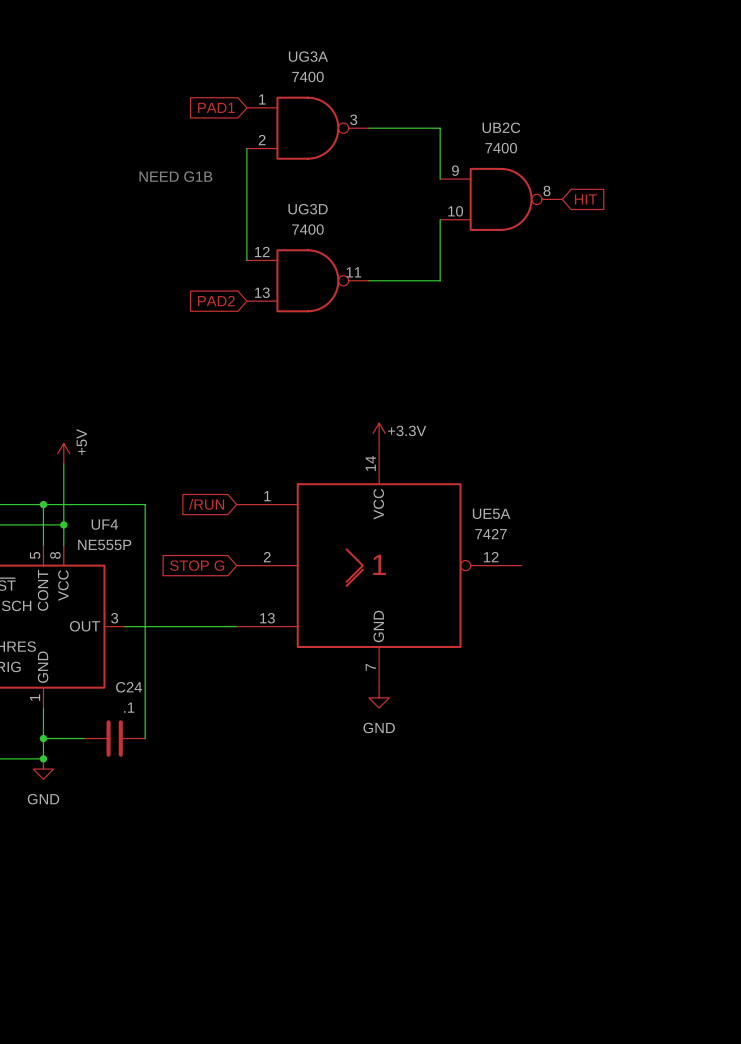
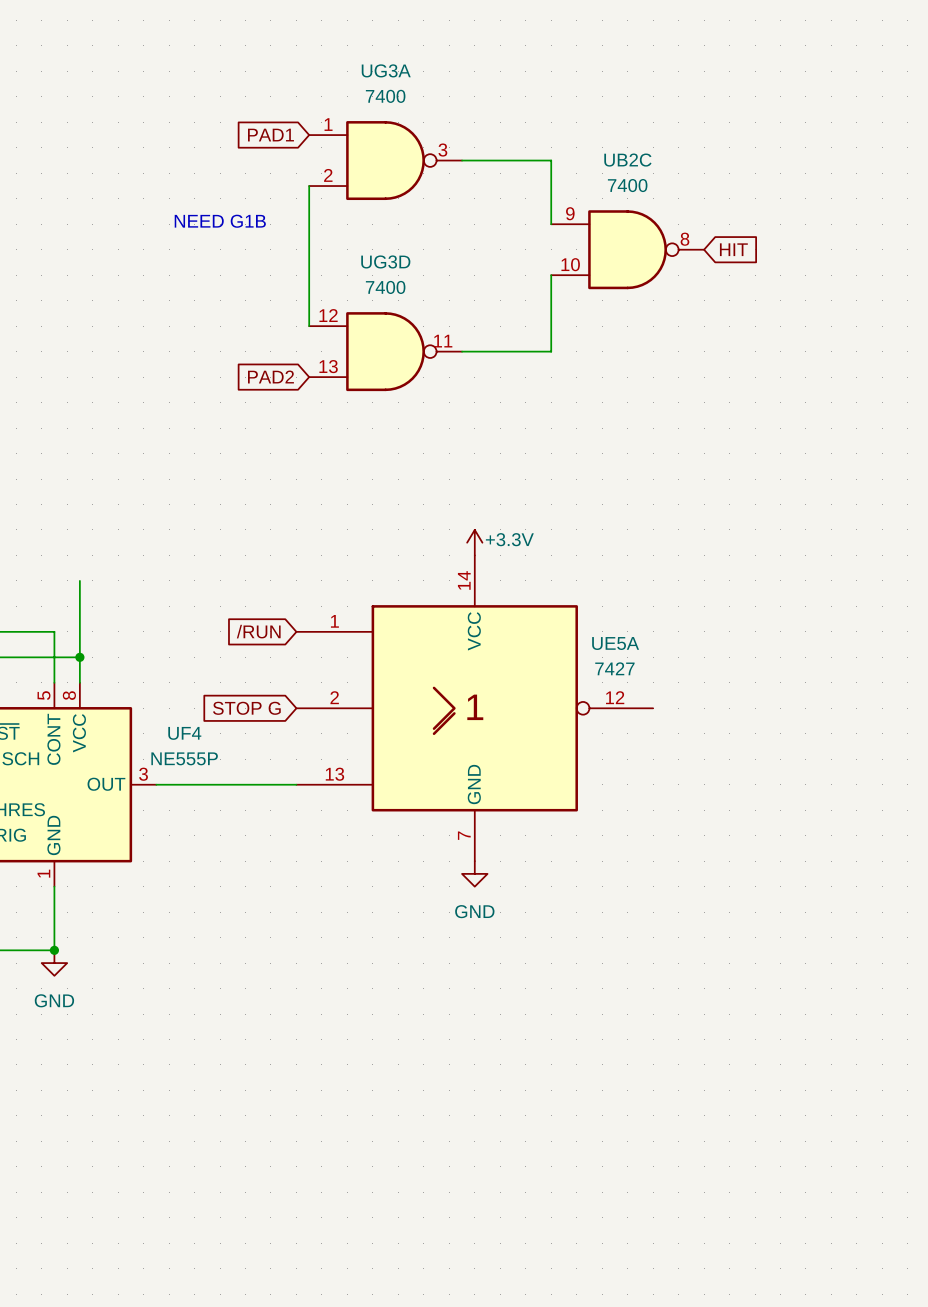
power symbol: +5V (63, 453) -> none
wire: (43, 504) (145, 504) (145, 738) -> none
junction: (43, 504) -> none
UF4 name position: UF4 (104, 524) -> UF4 (184, 733)
UF4 value position: NE555P (104, 544) -> NE555P (184, 758)
wire: (43, 738) (84, 738) -> none
junction: (43, 738) -> none
C24: .1 (114, 738) -> none

